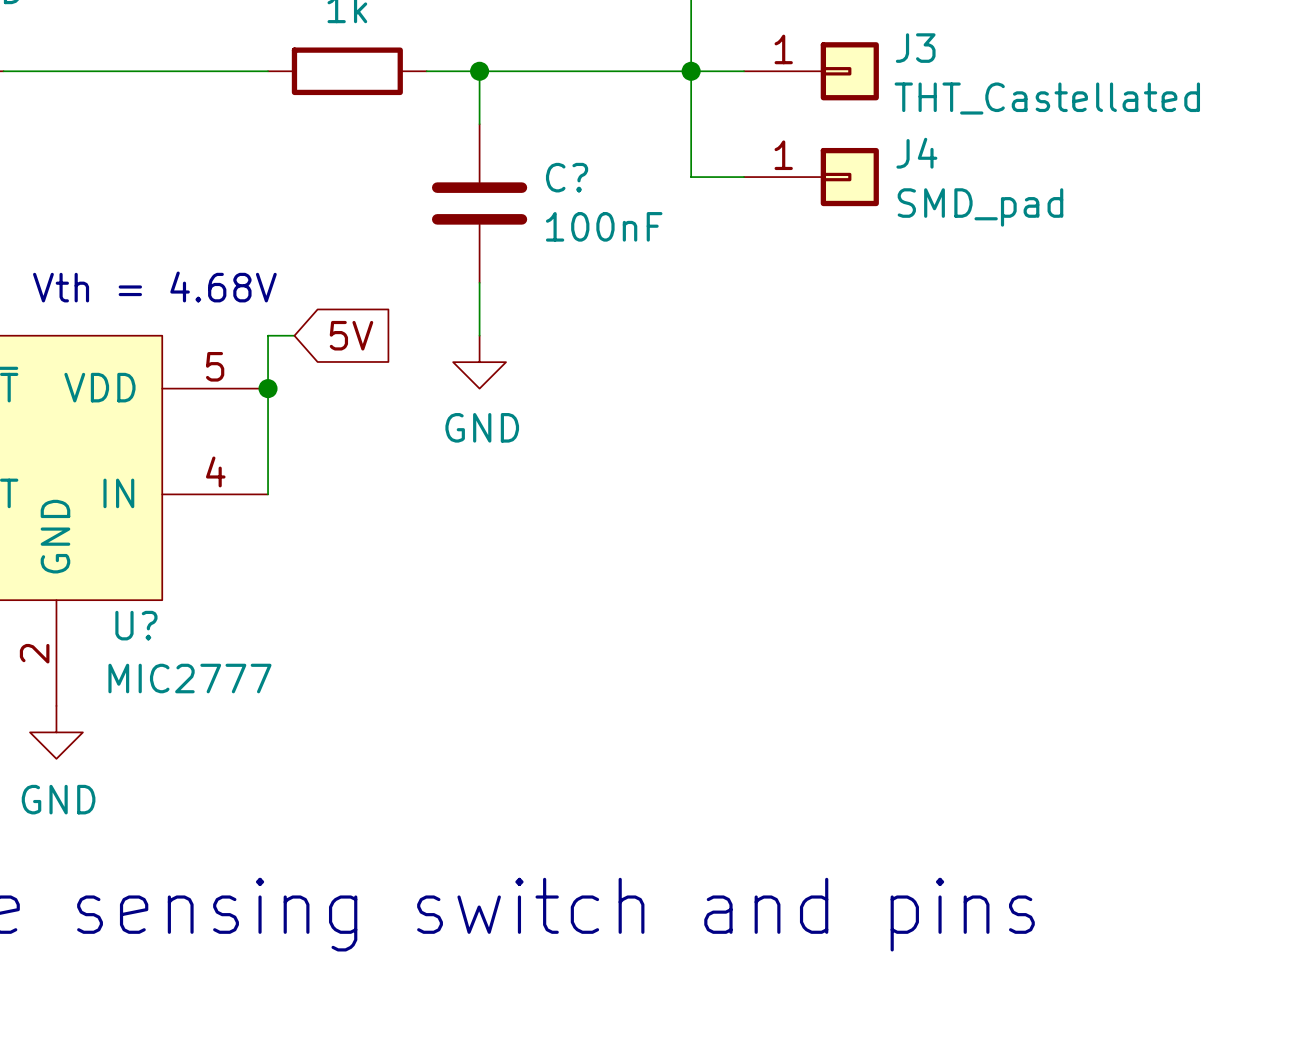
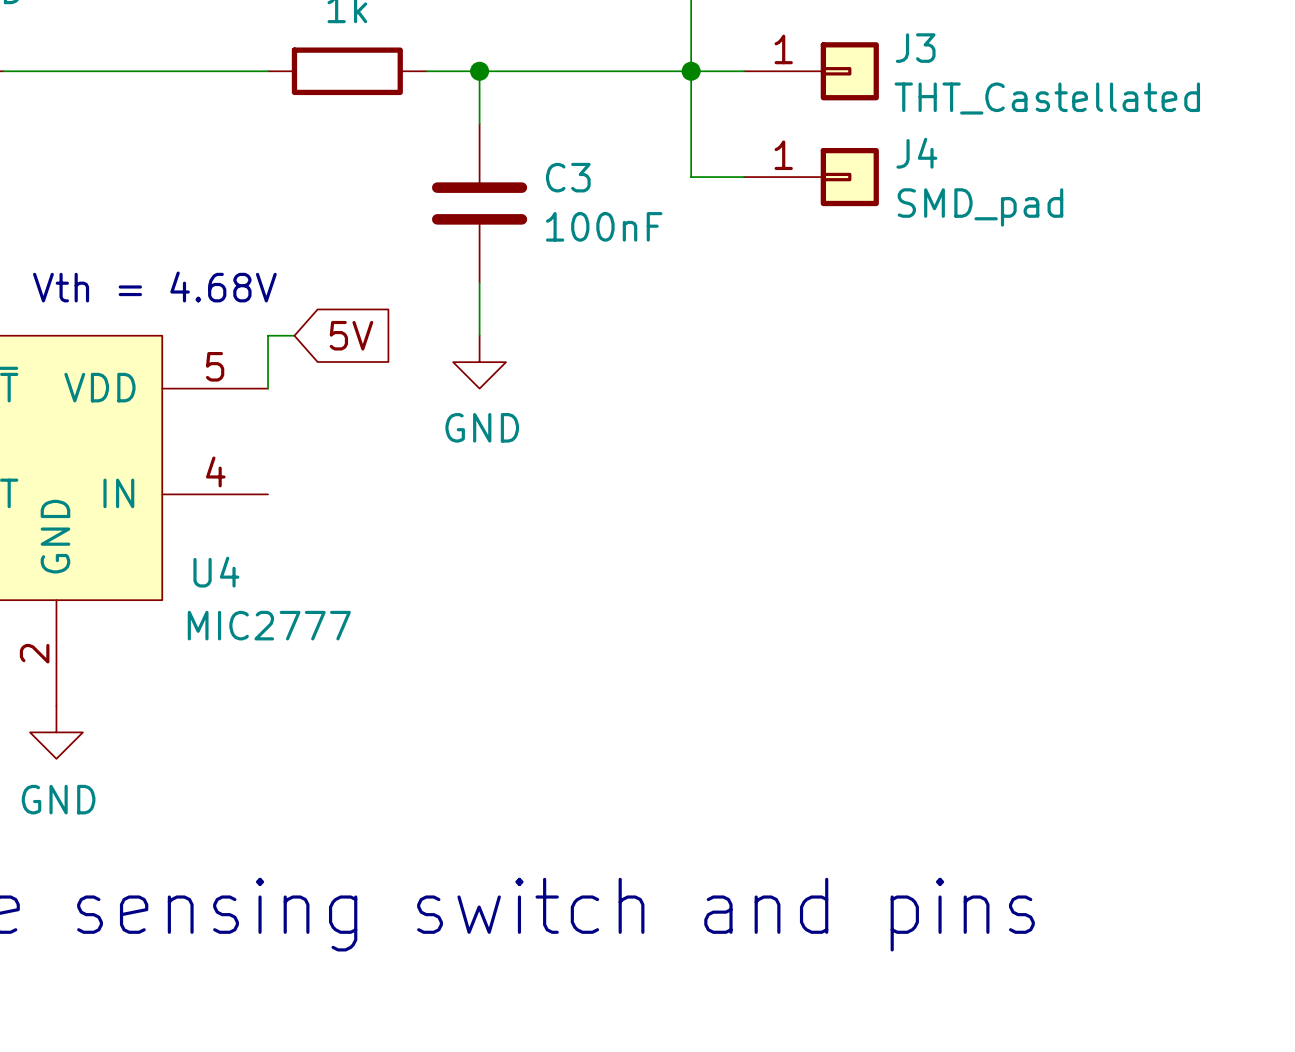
C? name: C? (567, 177) -> C3 (568, 177)
wire: (268, 388) (268, 494) -> none
junction: (268, 388) -> none
U? name: U? (136, 625) -> U4 (216, 572)
U? value position: MIC2777 (189, 678) -> MIC2777 (269, 625)

